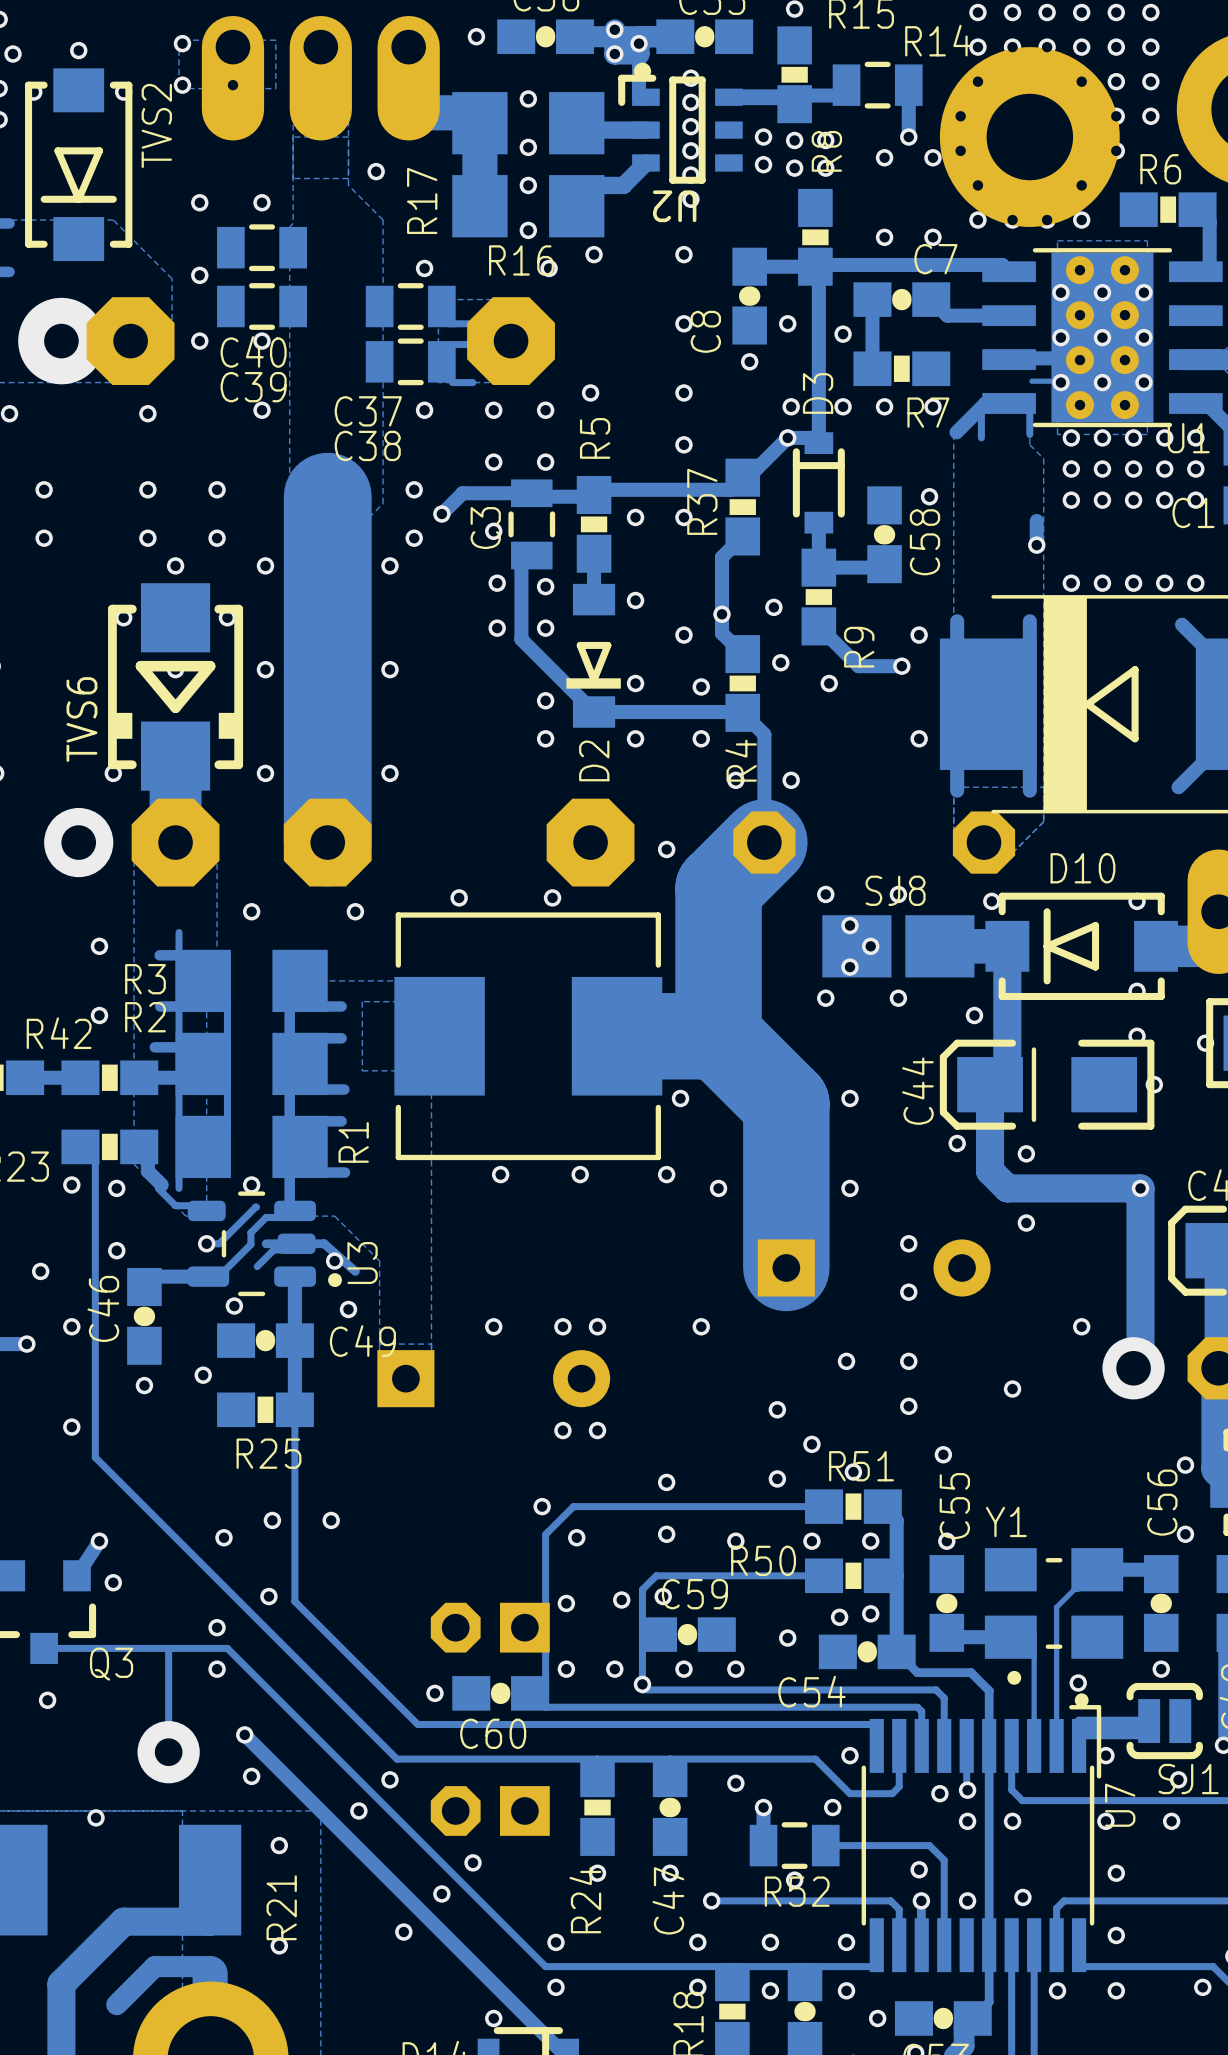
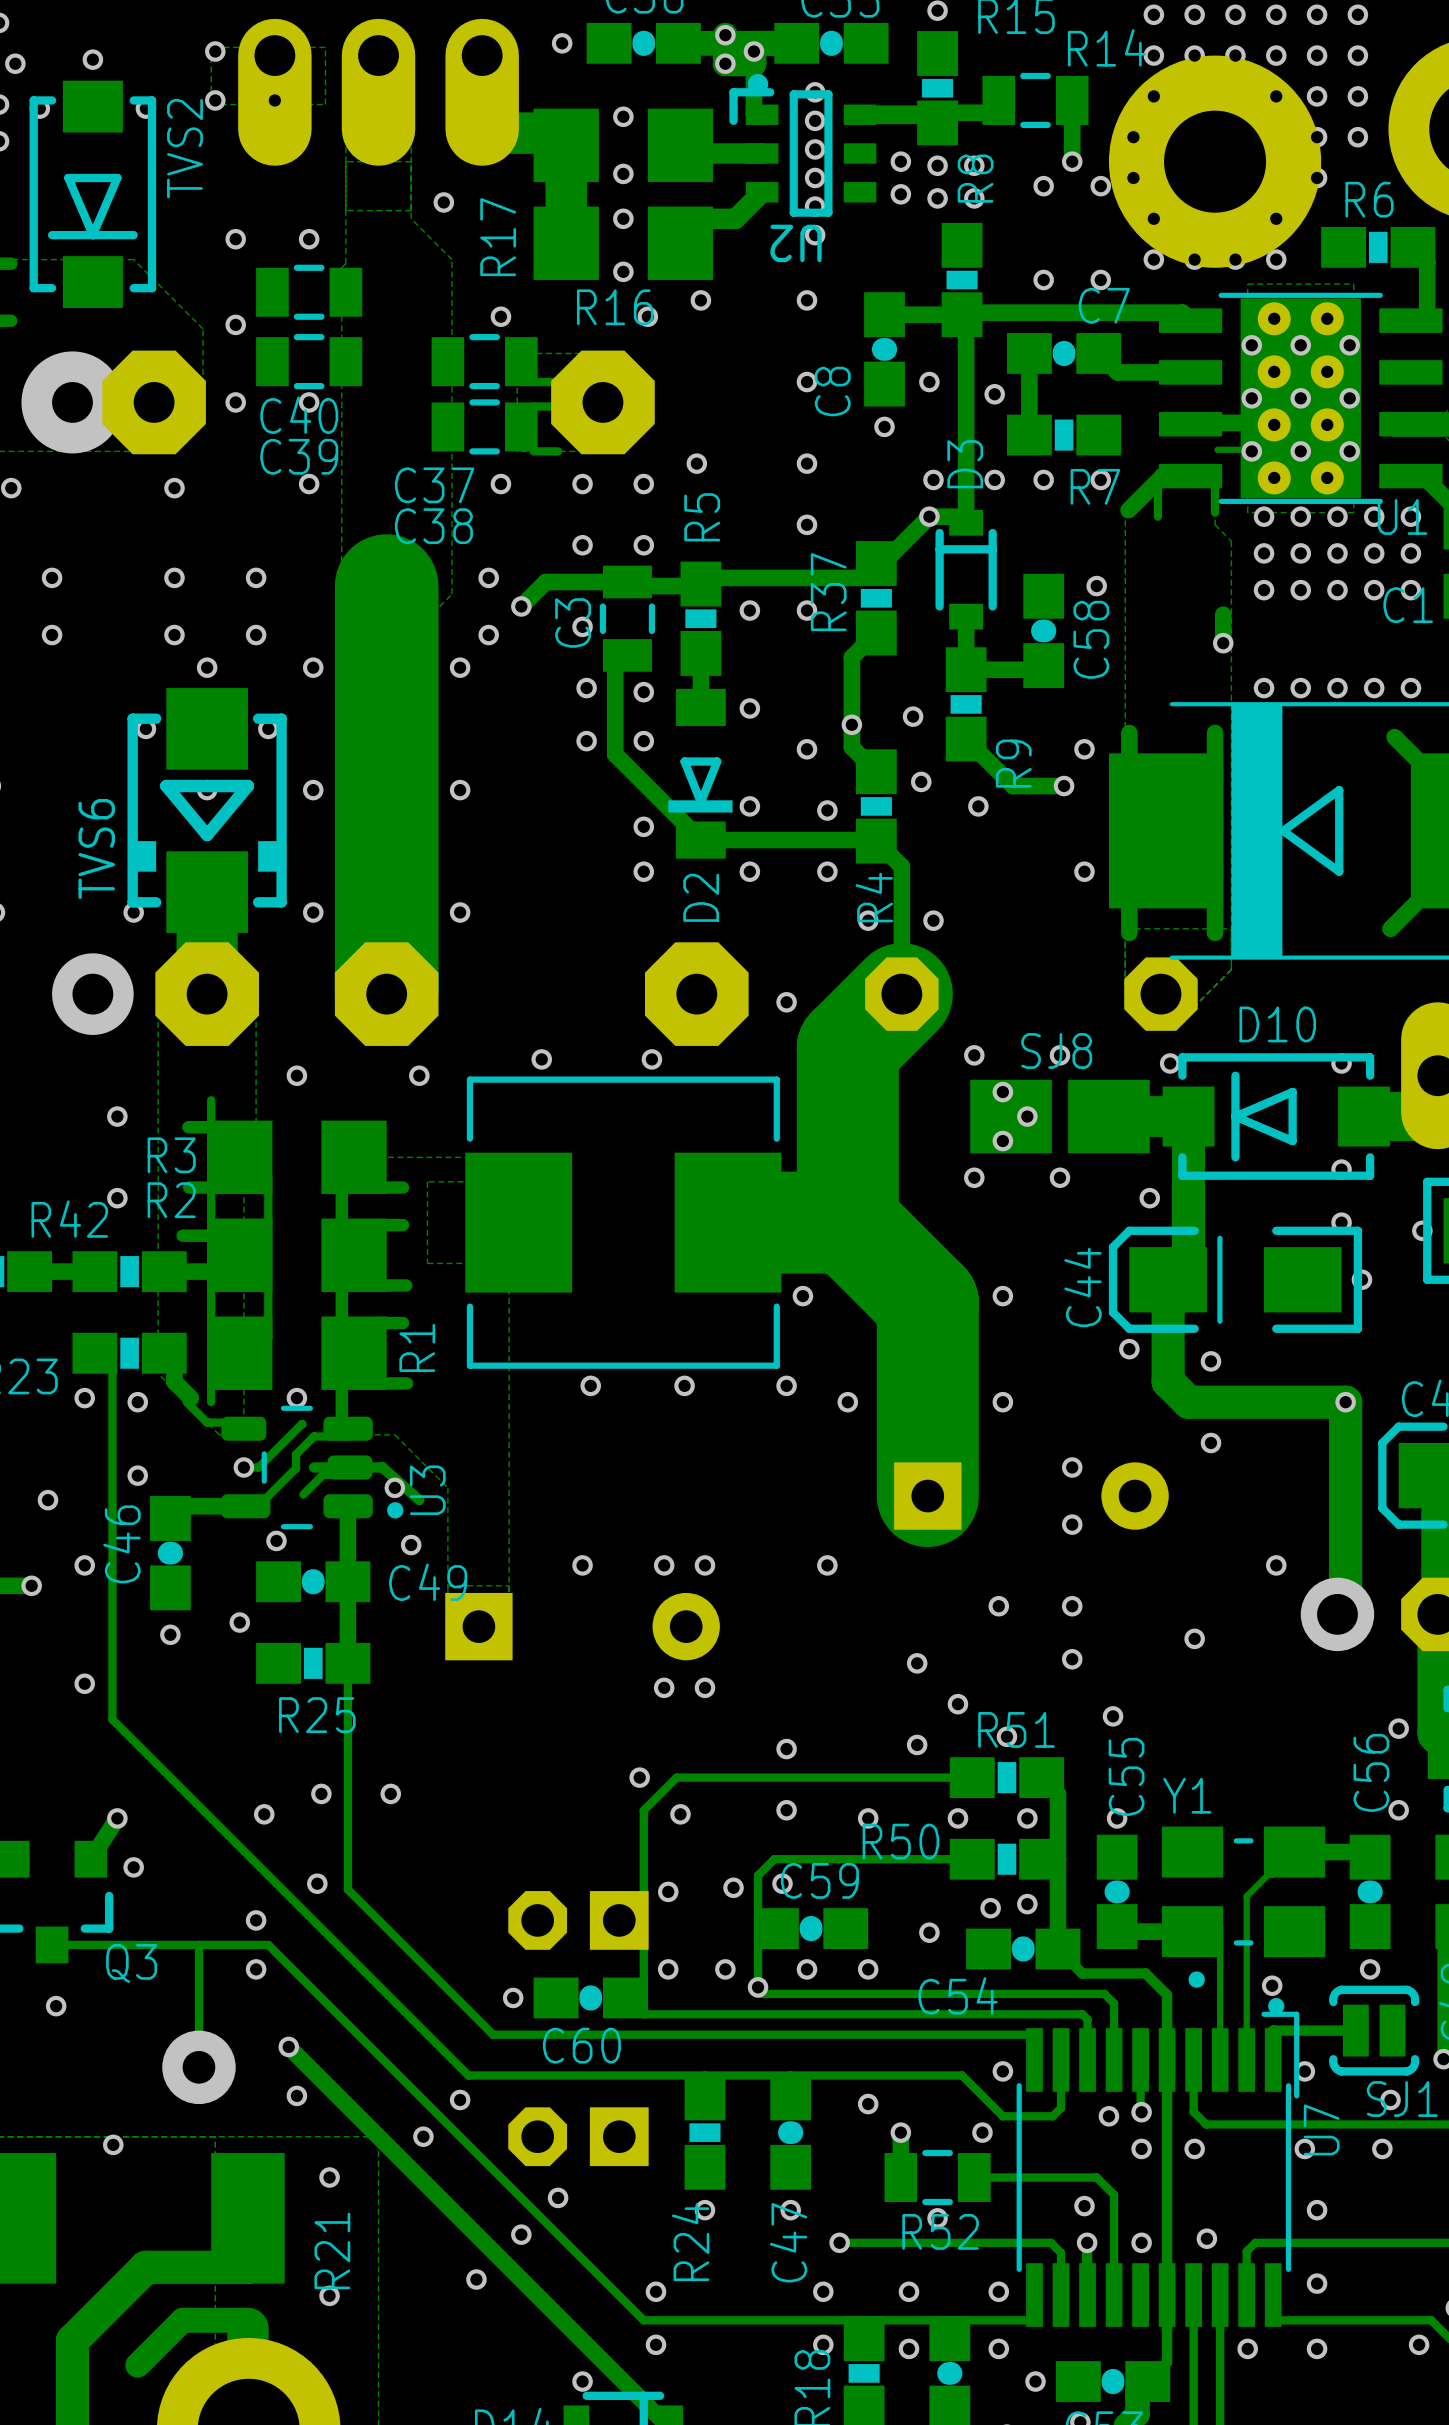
track: (1149, 1727) (1079, 1727) -> none
track: (1149, 1734) (1079, 1734) -> none

